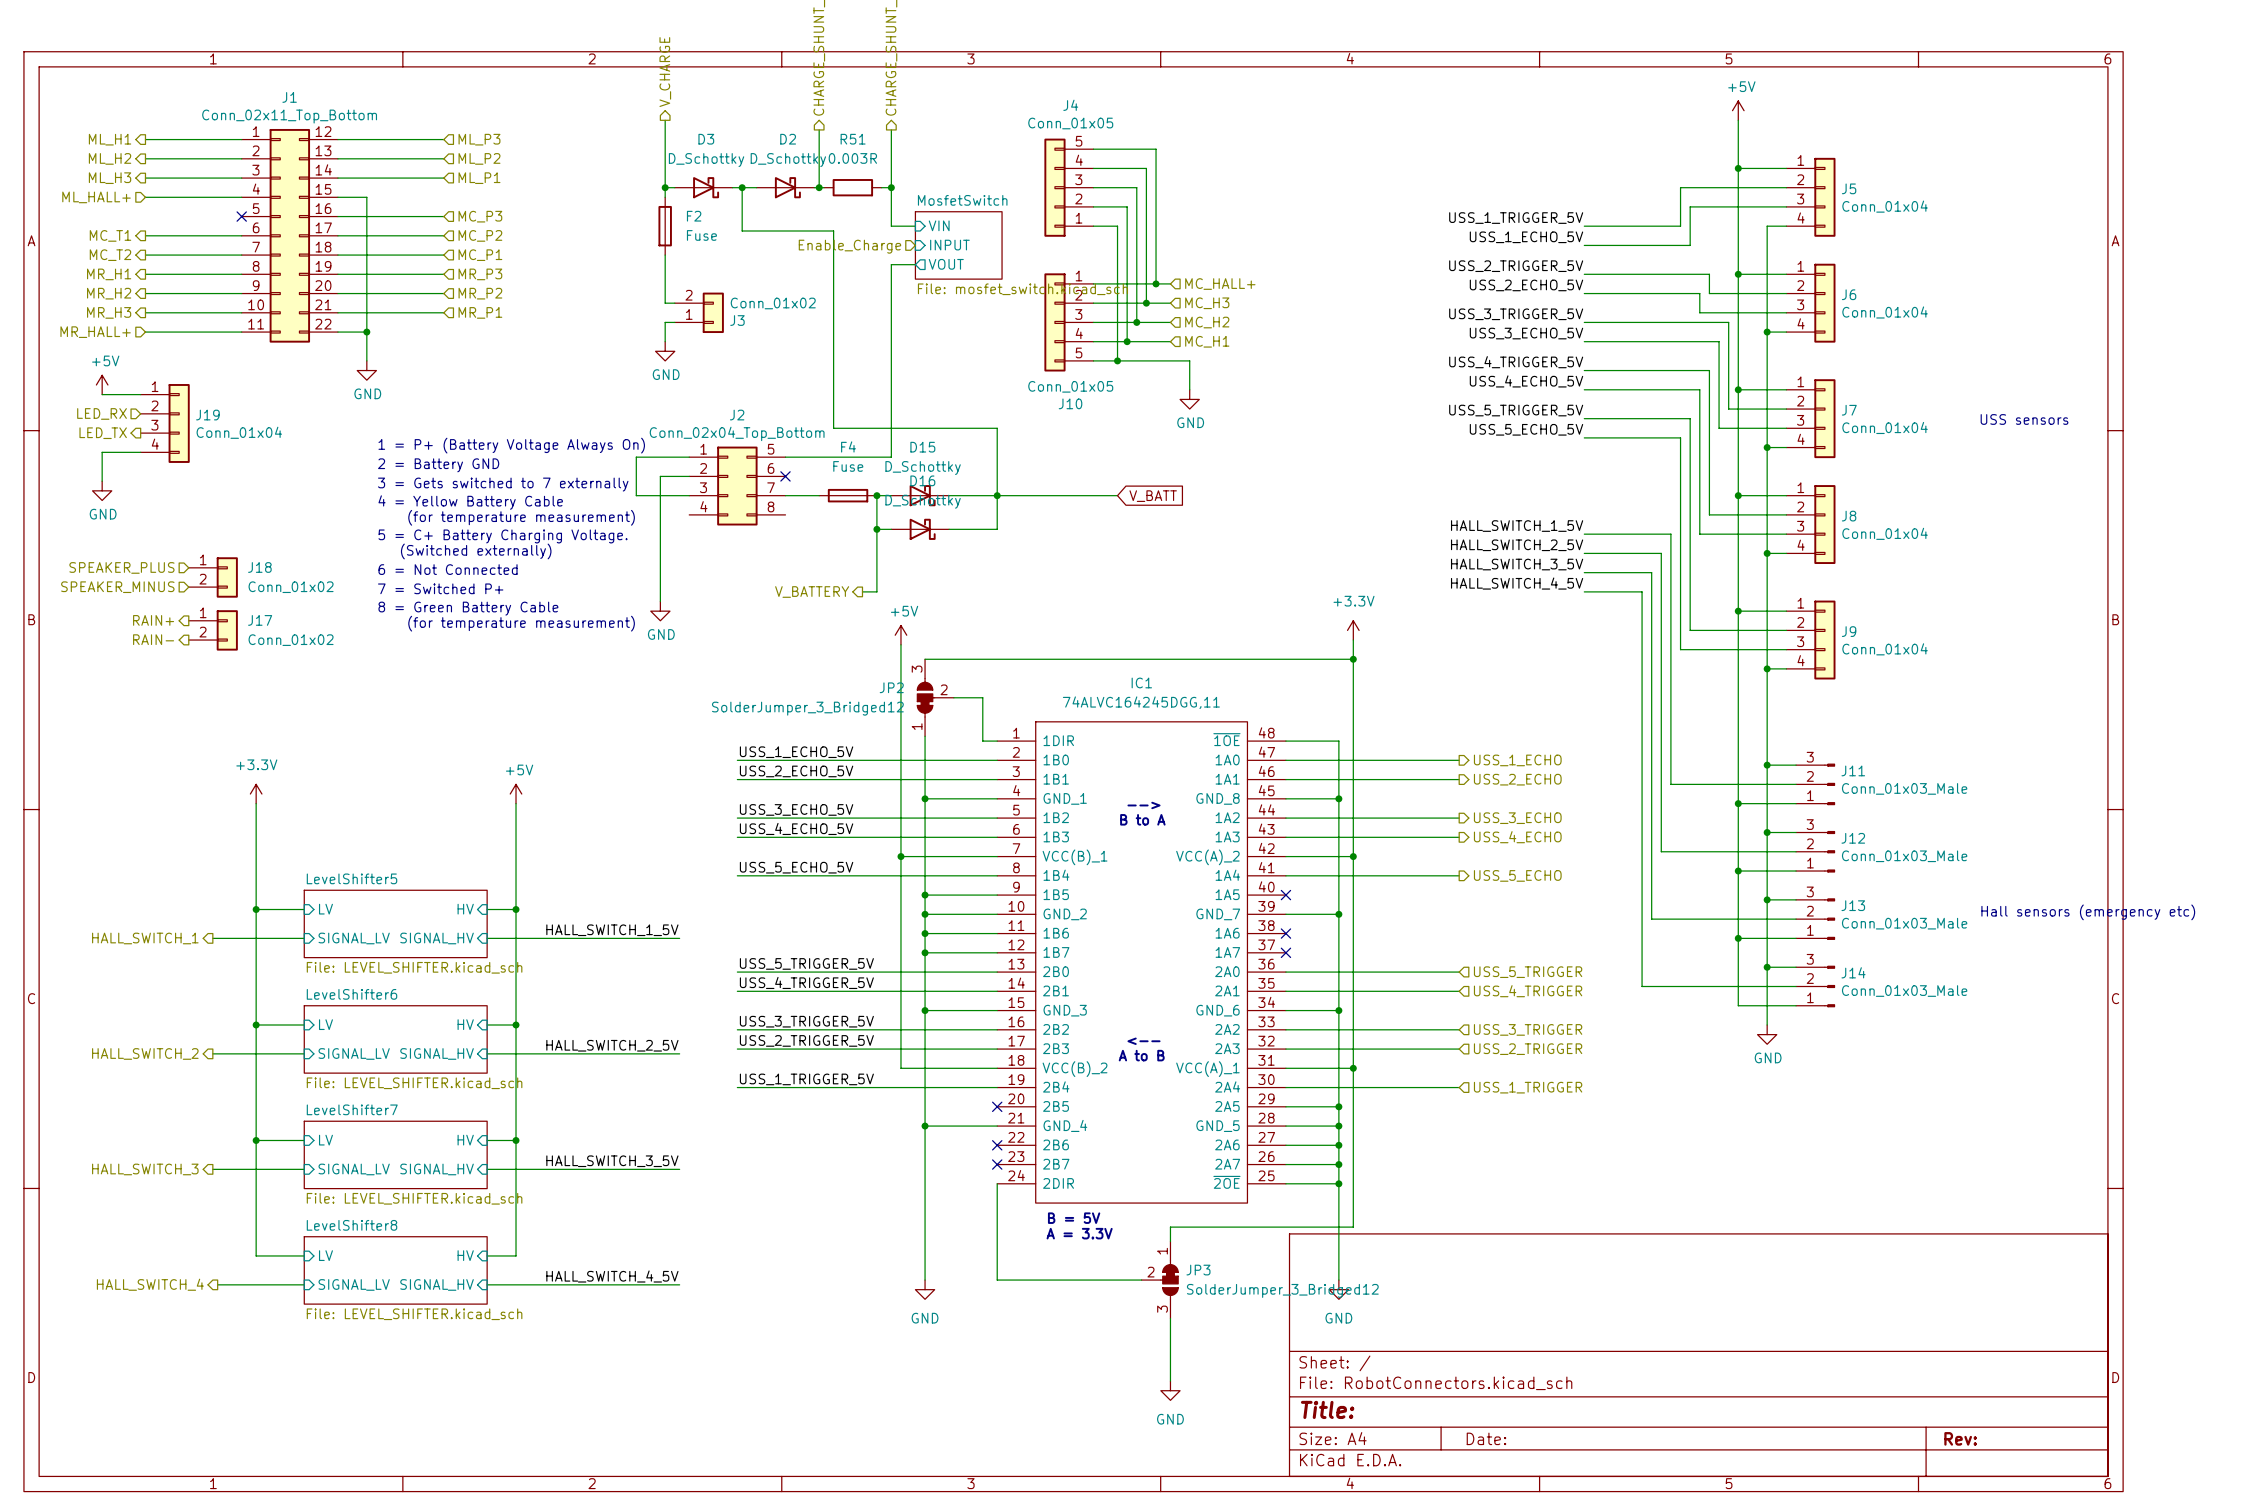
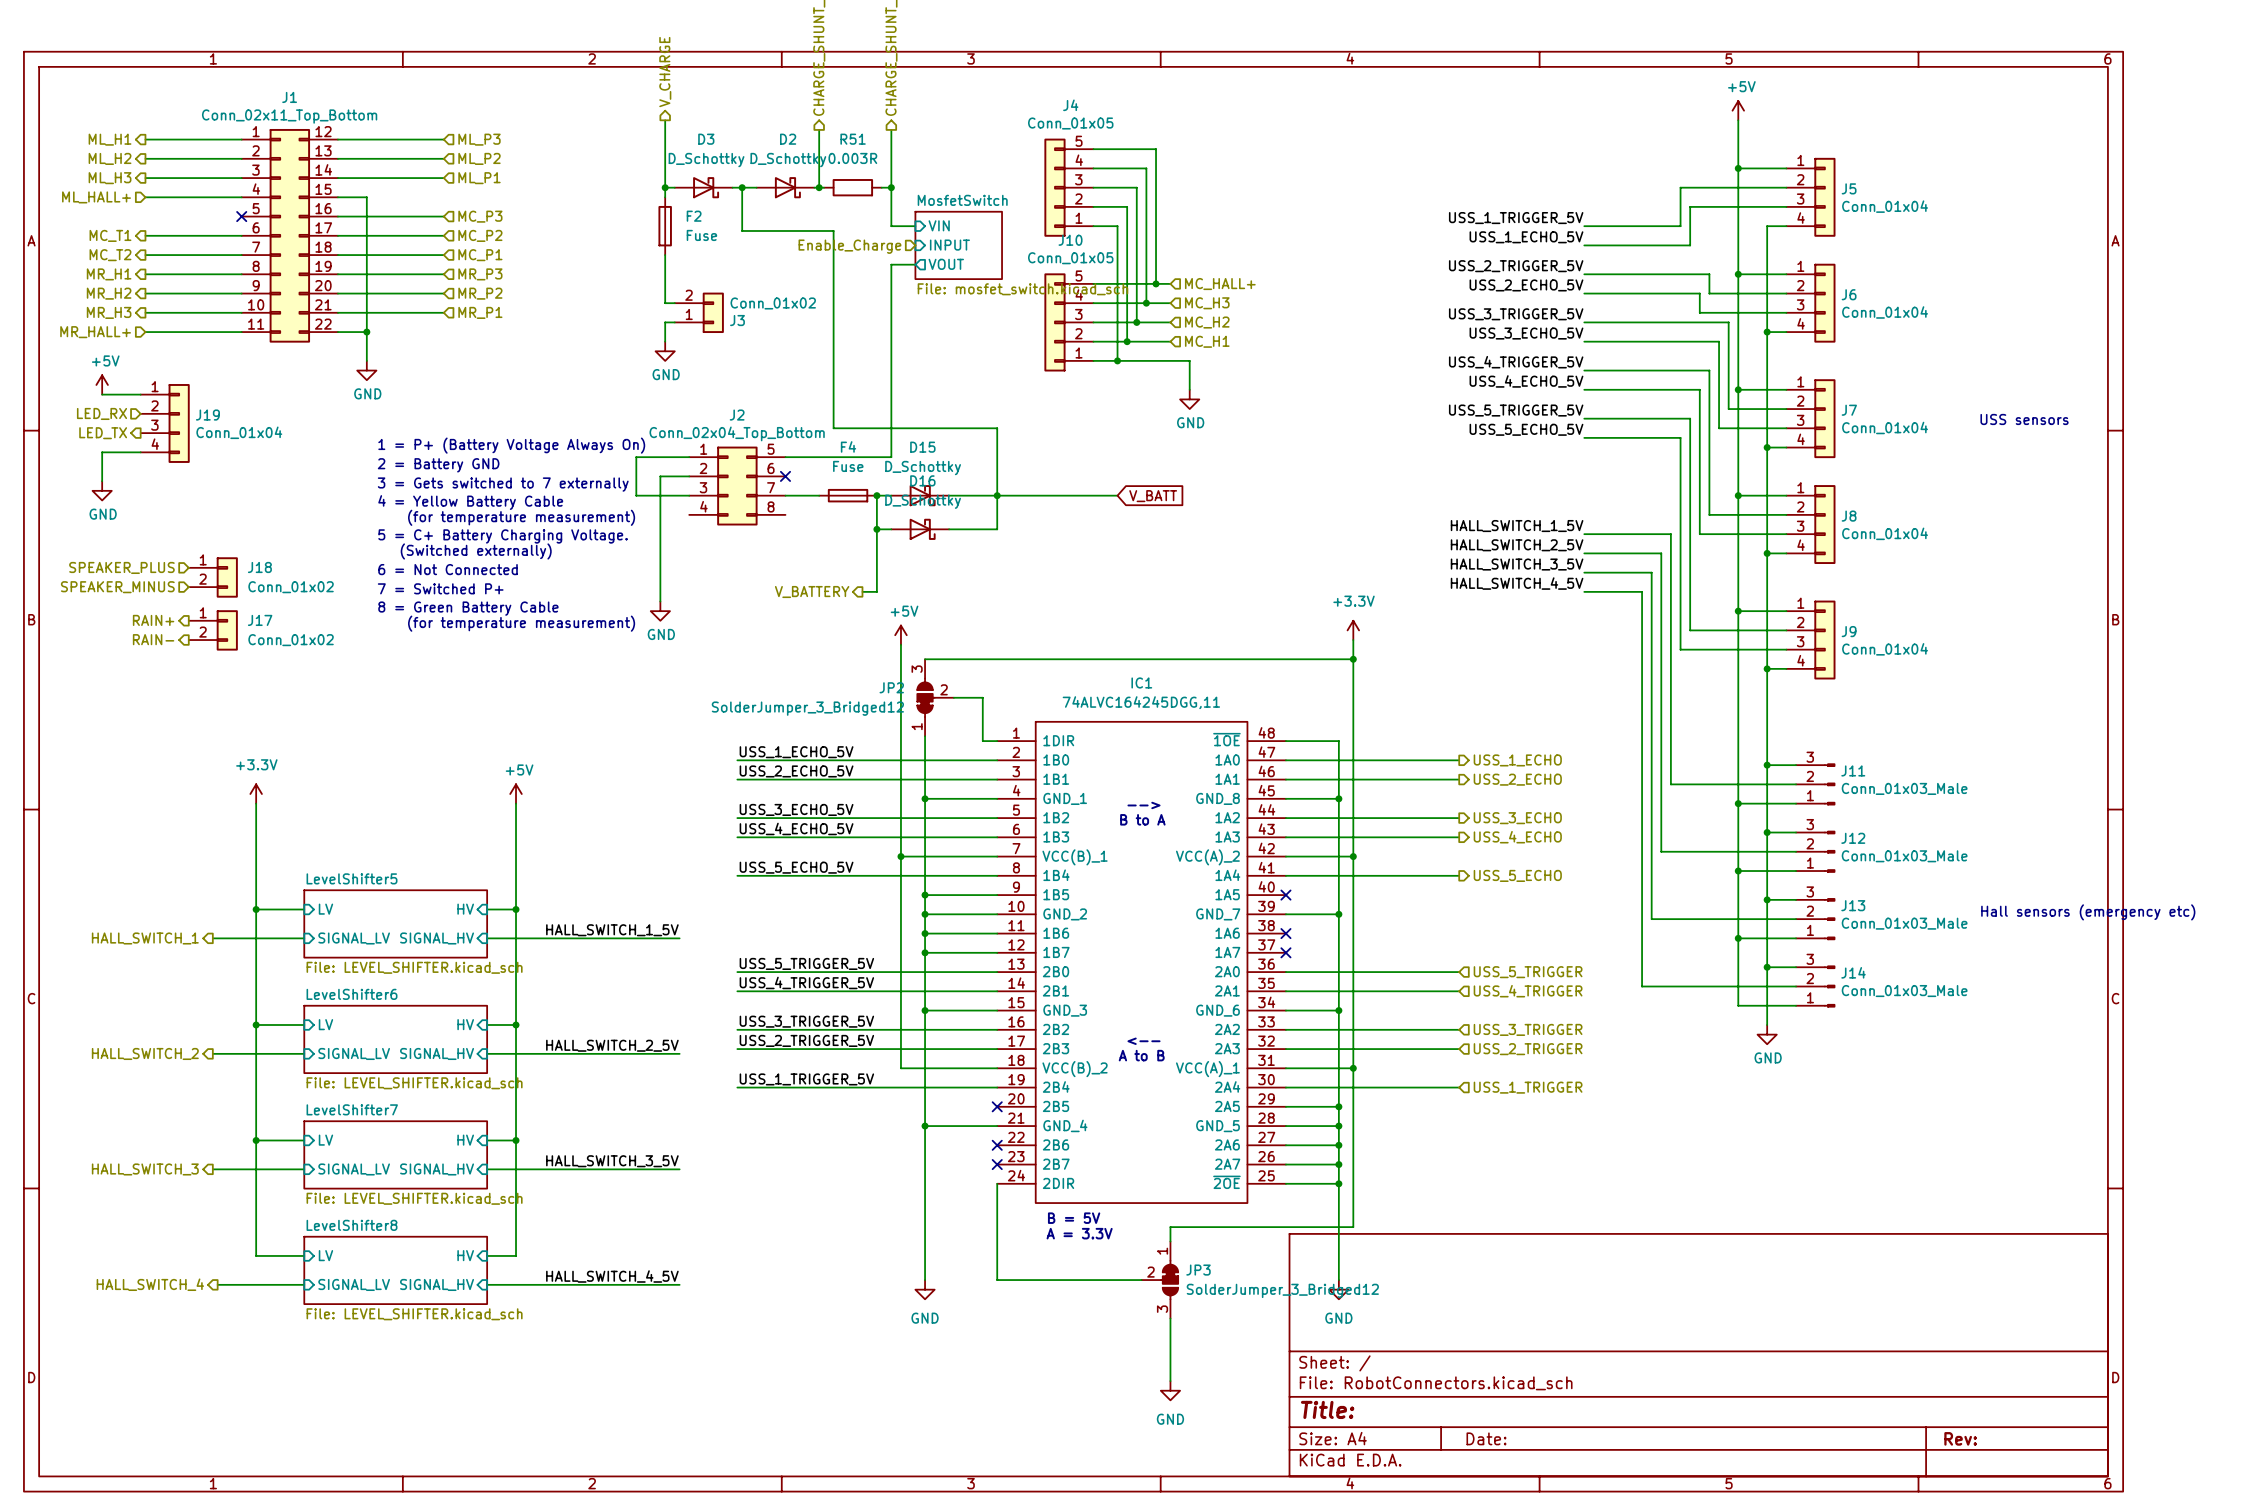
J10 flip: as is (1054, 322) -> up-down (1054, 322)

